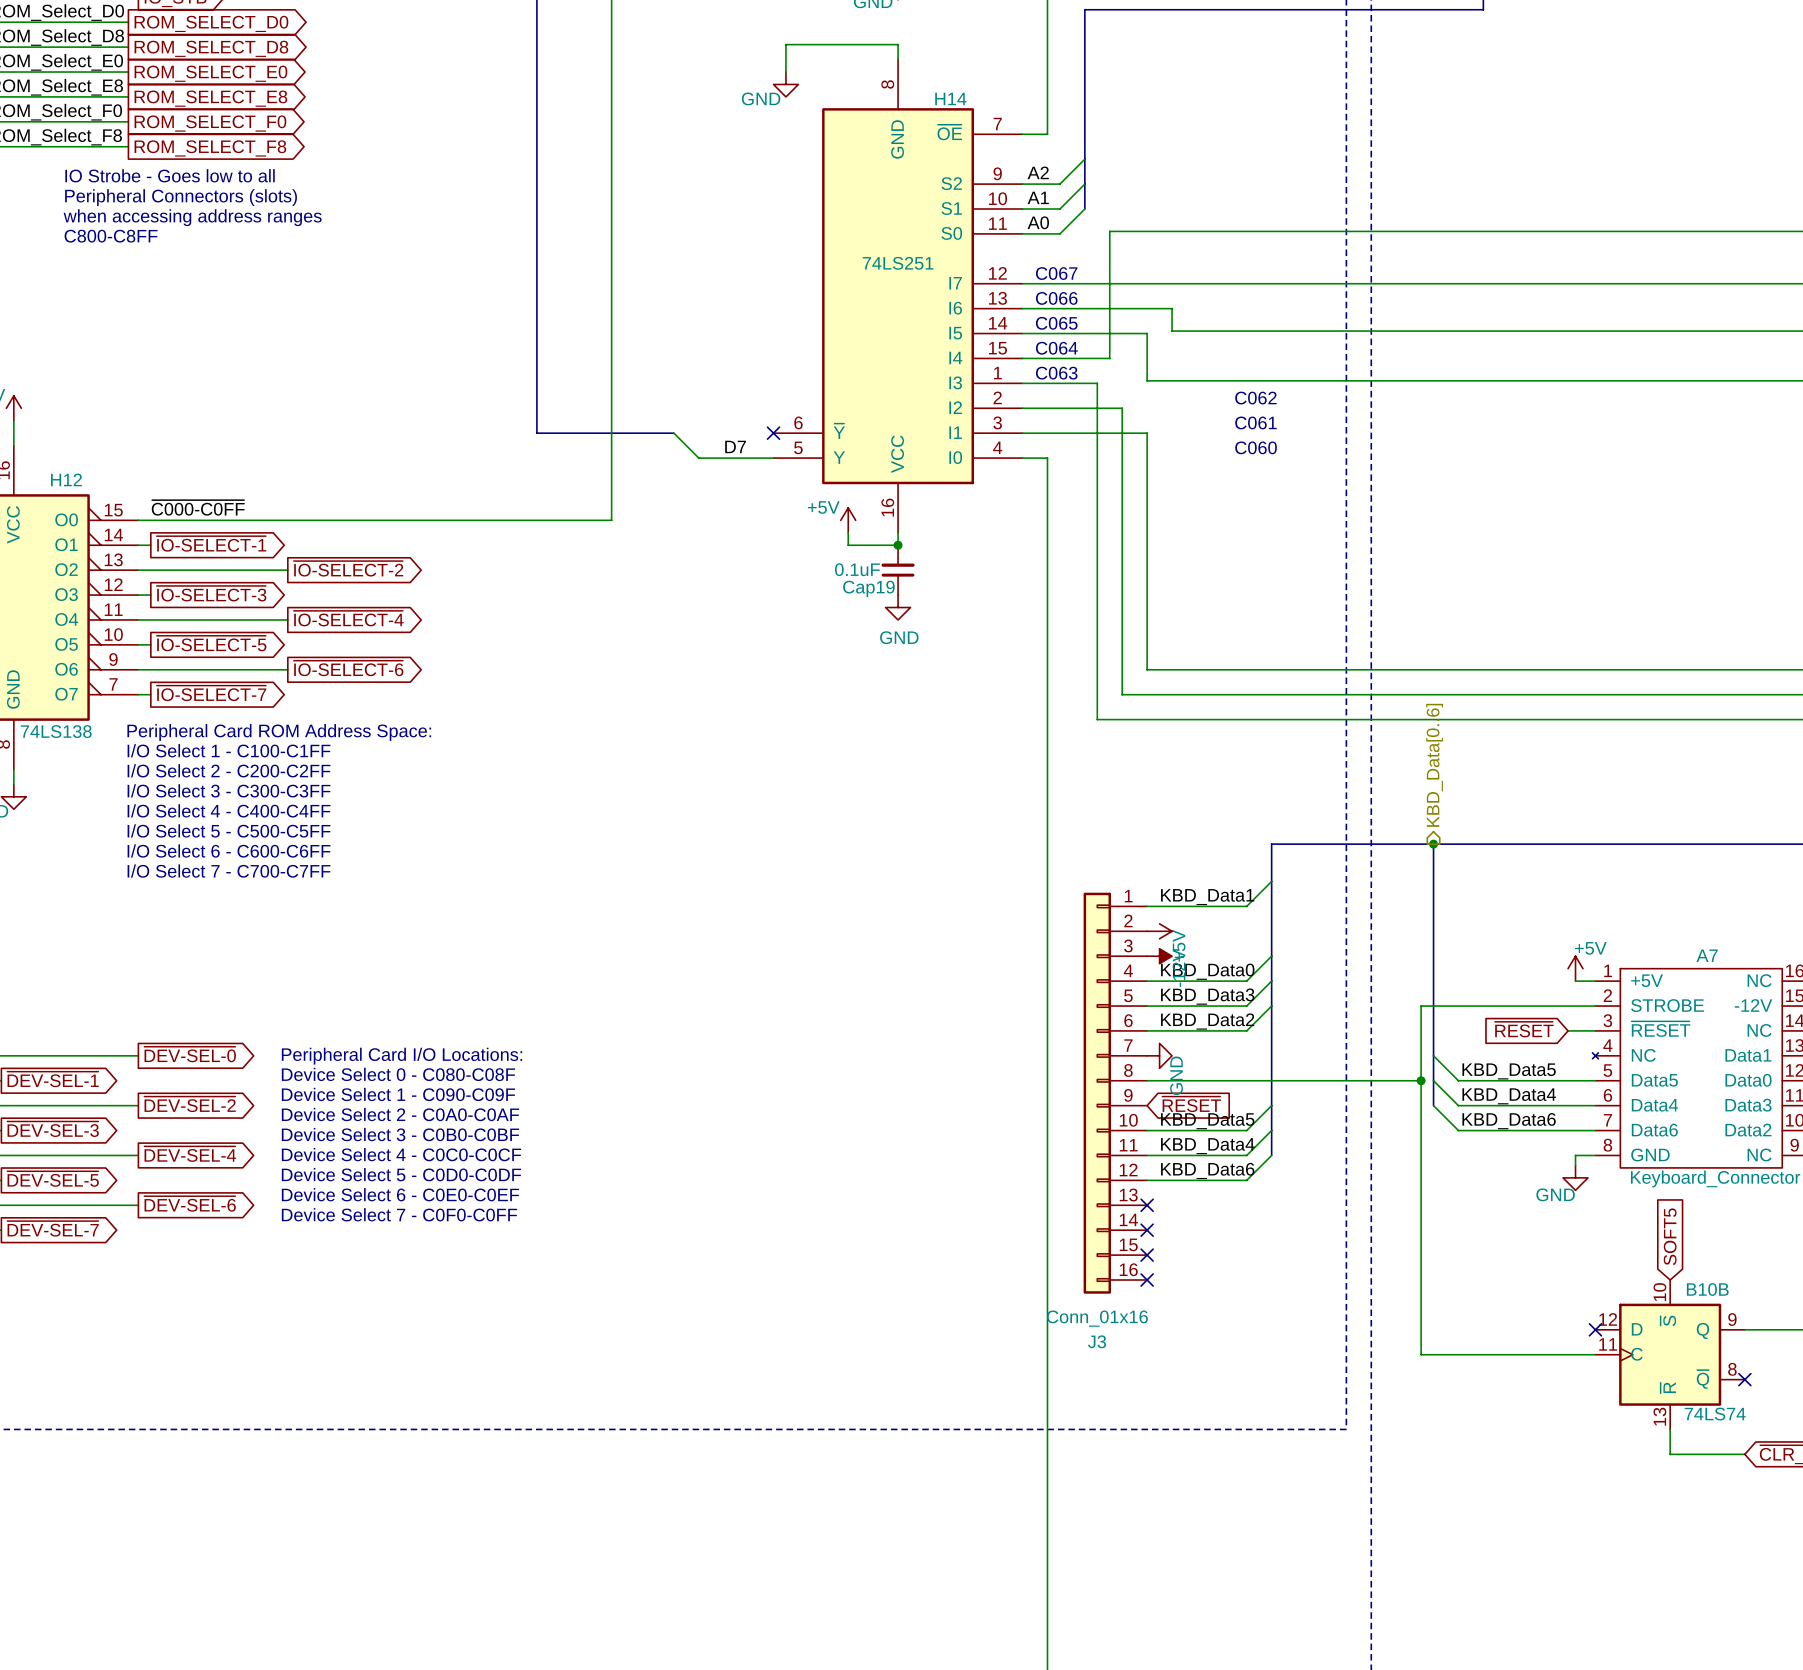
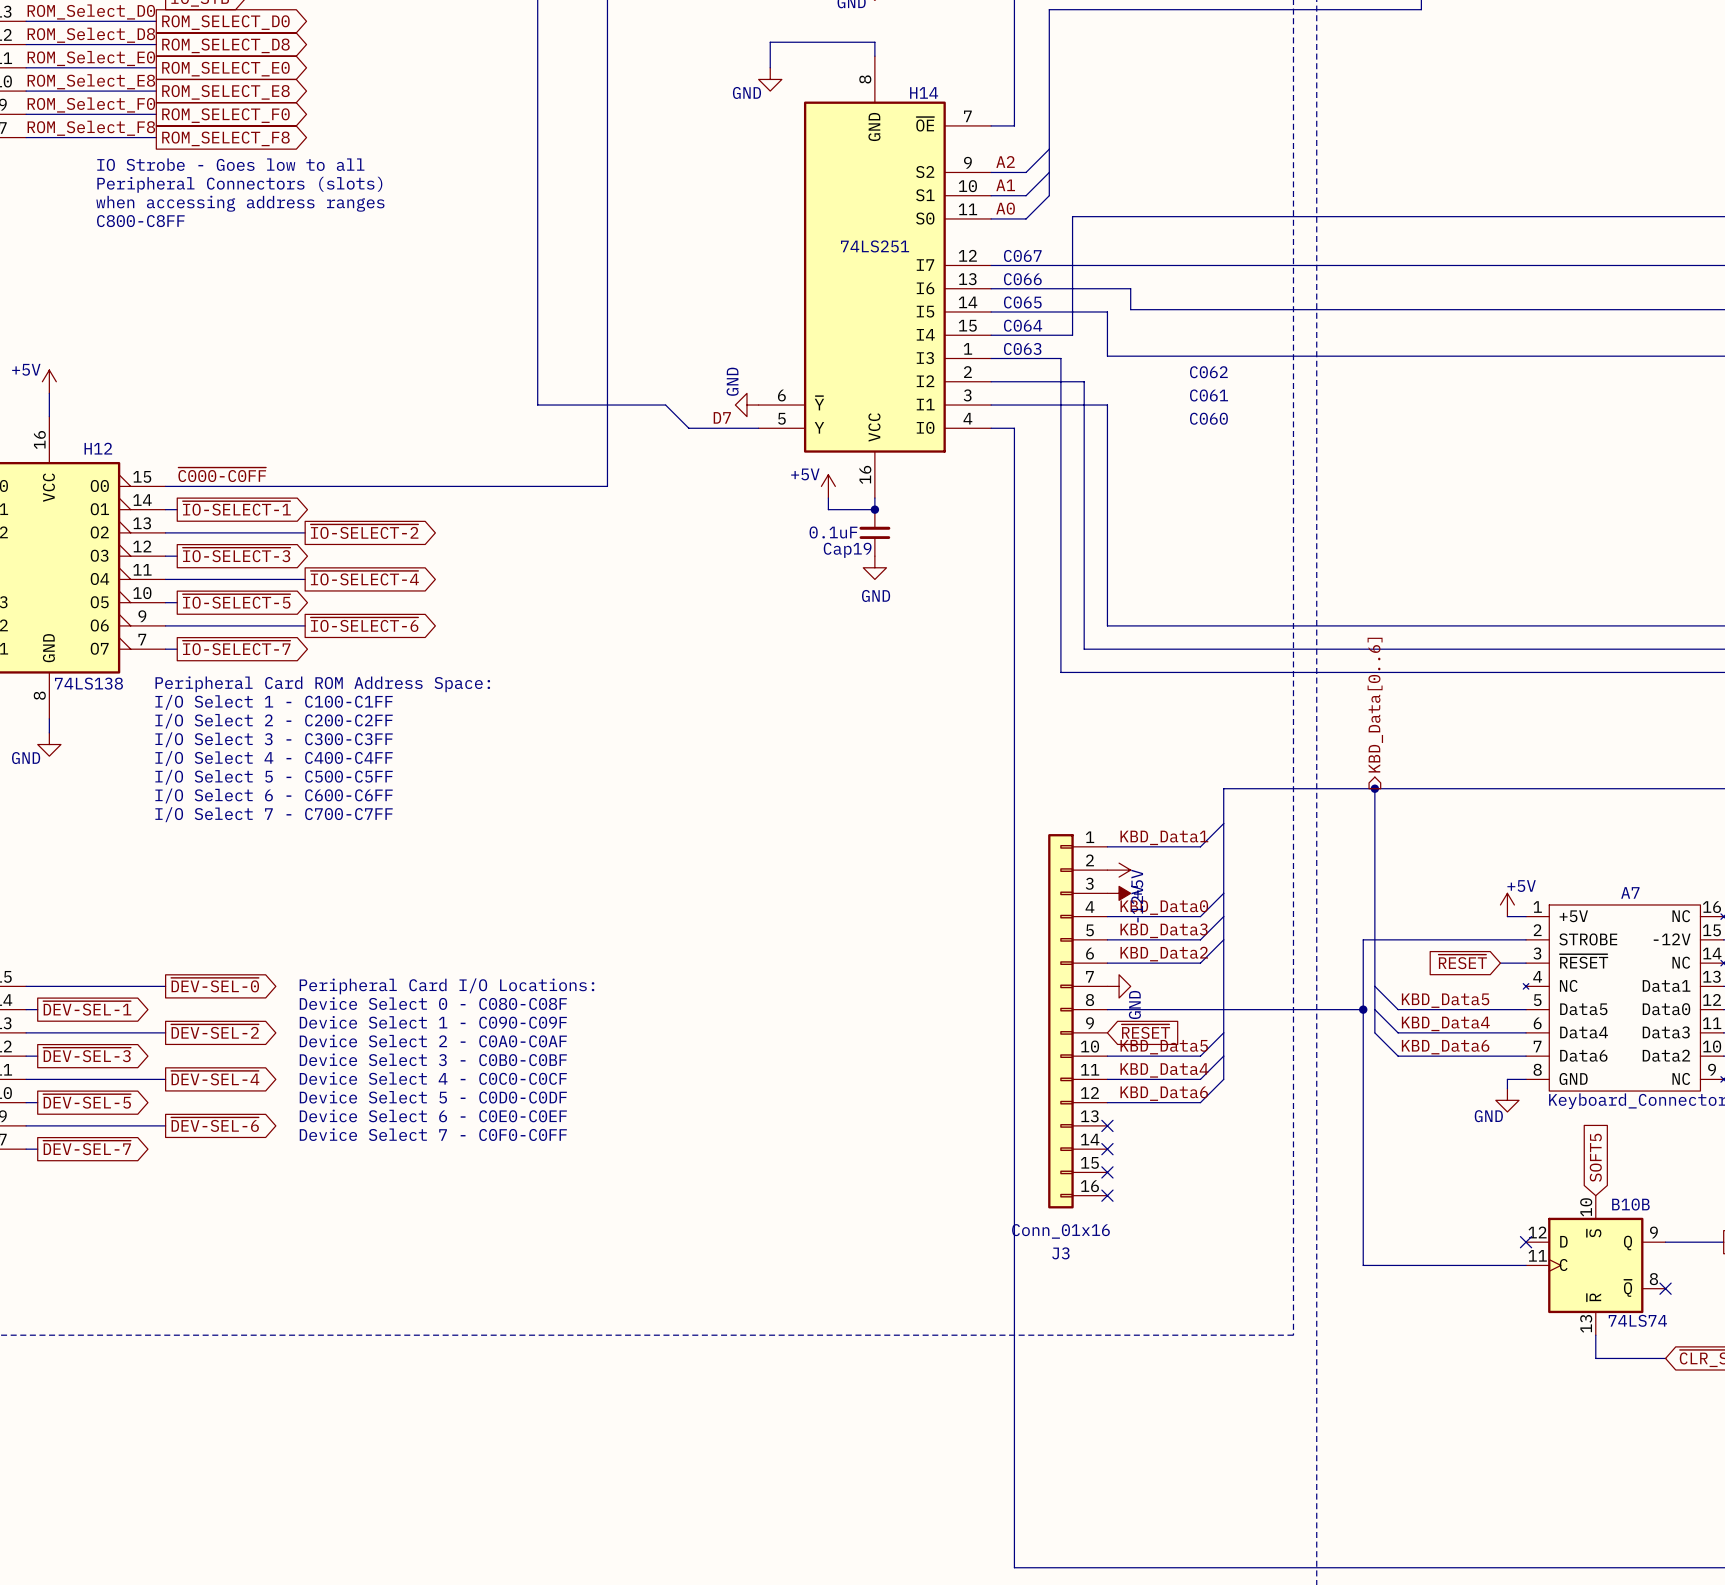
power symbol: none -> GND (746, 405)
no-connect mark: (773, 433) -> none

